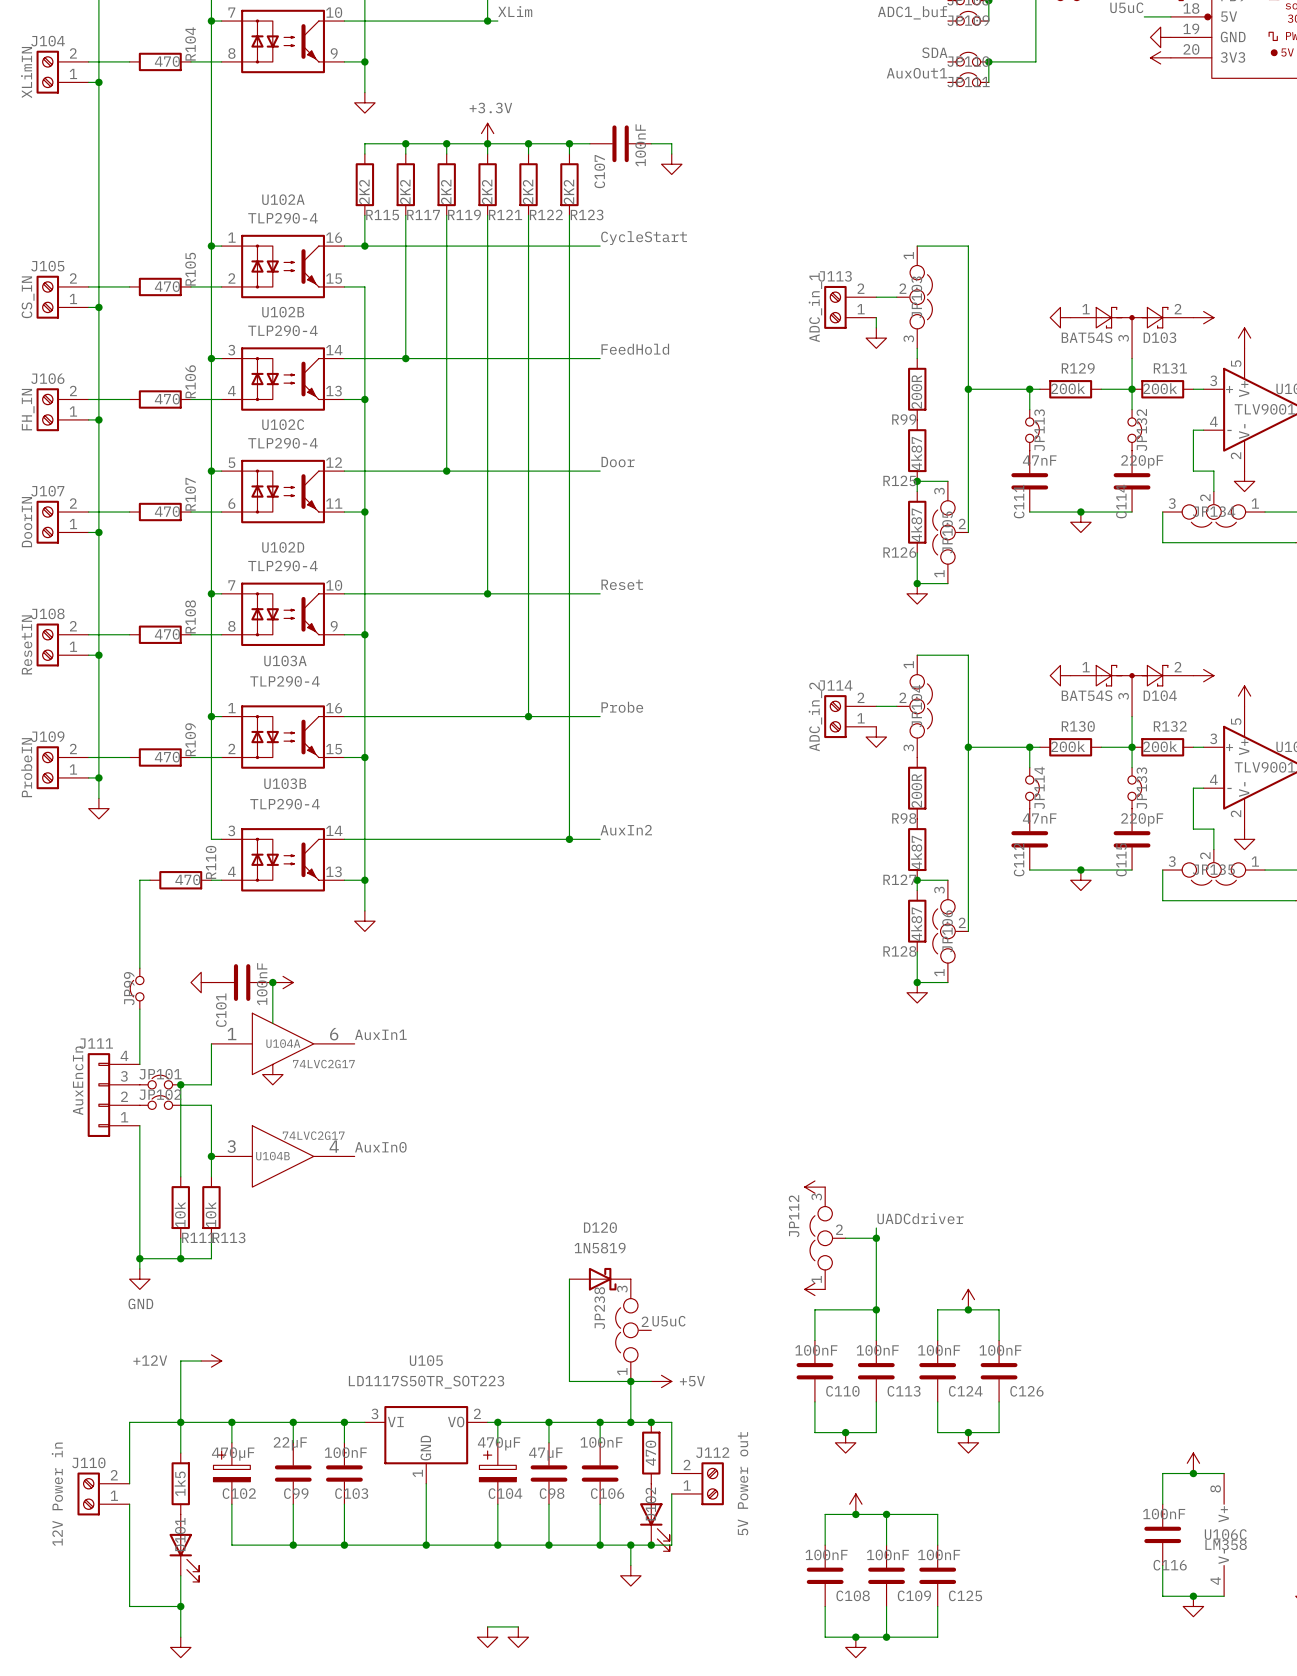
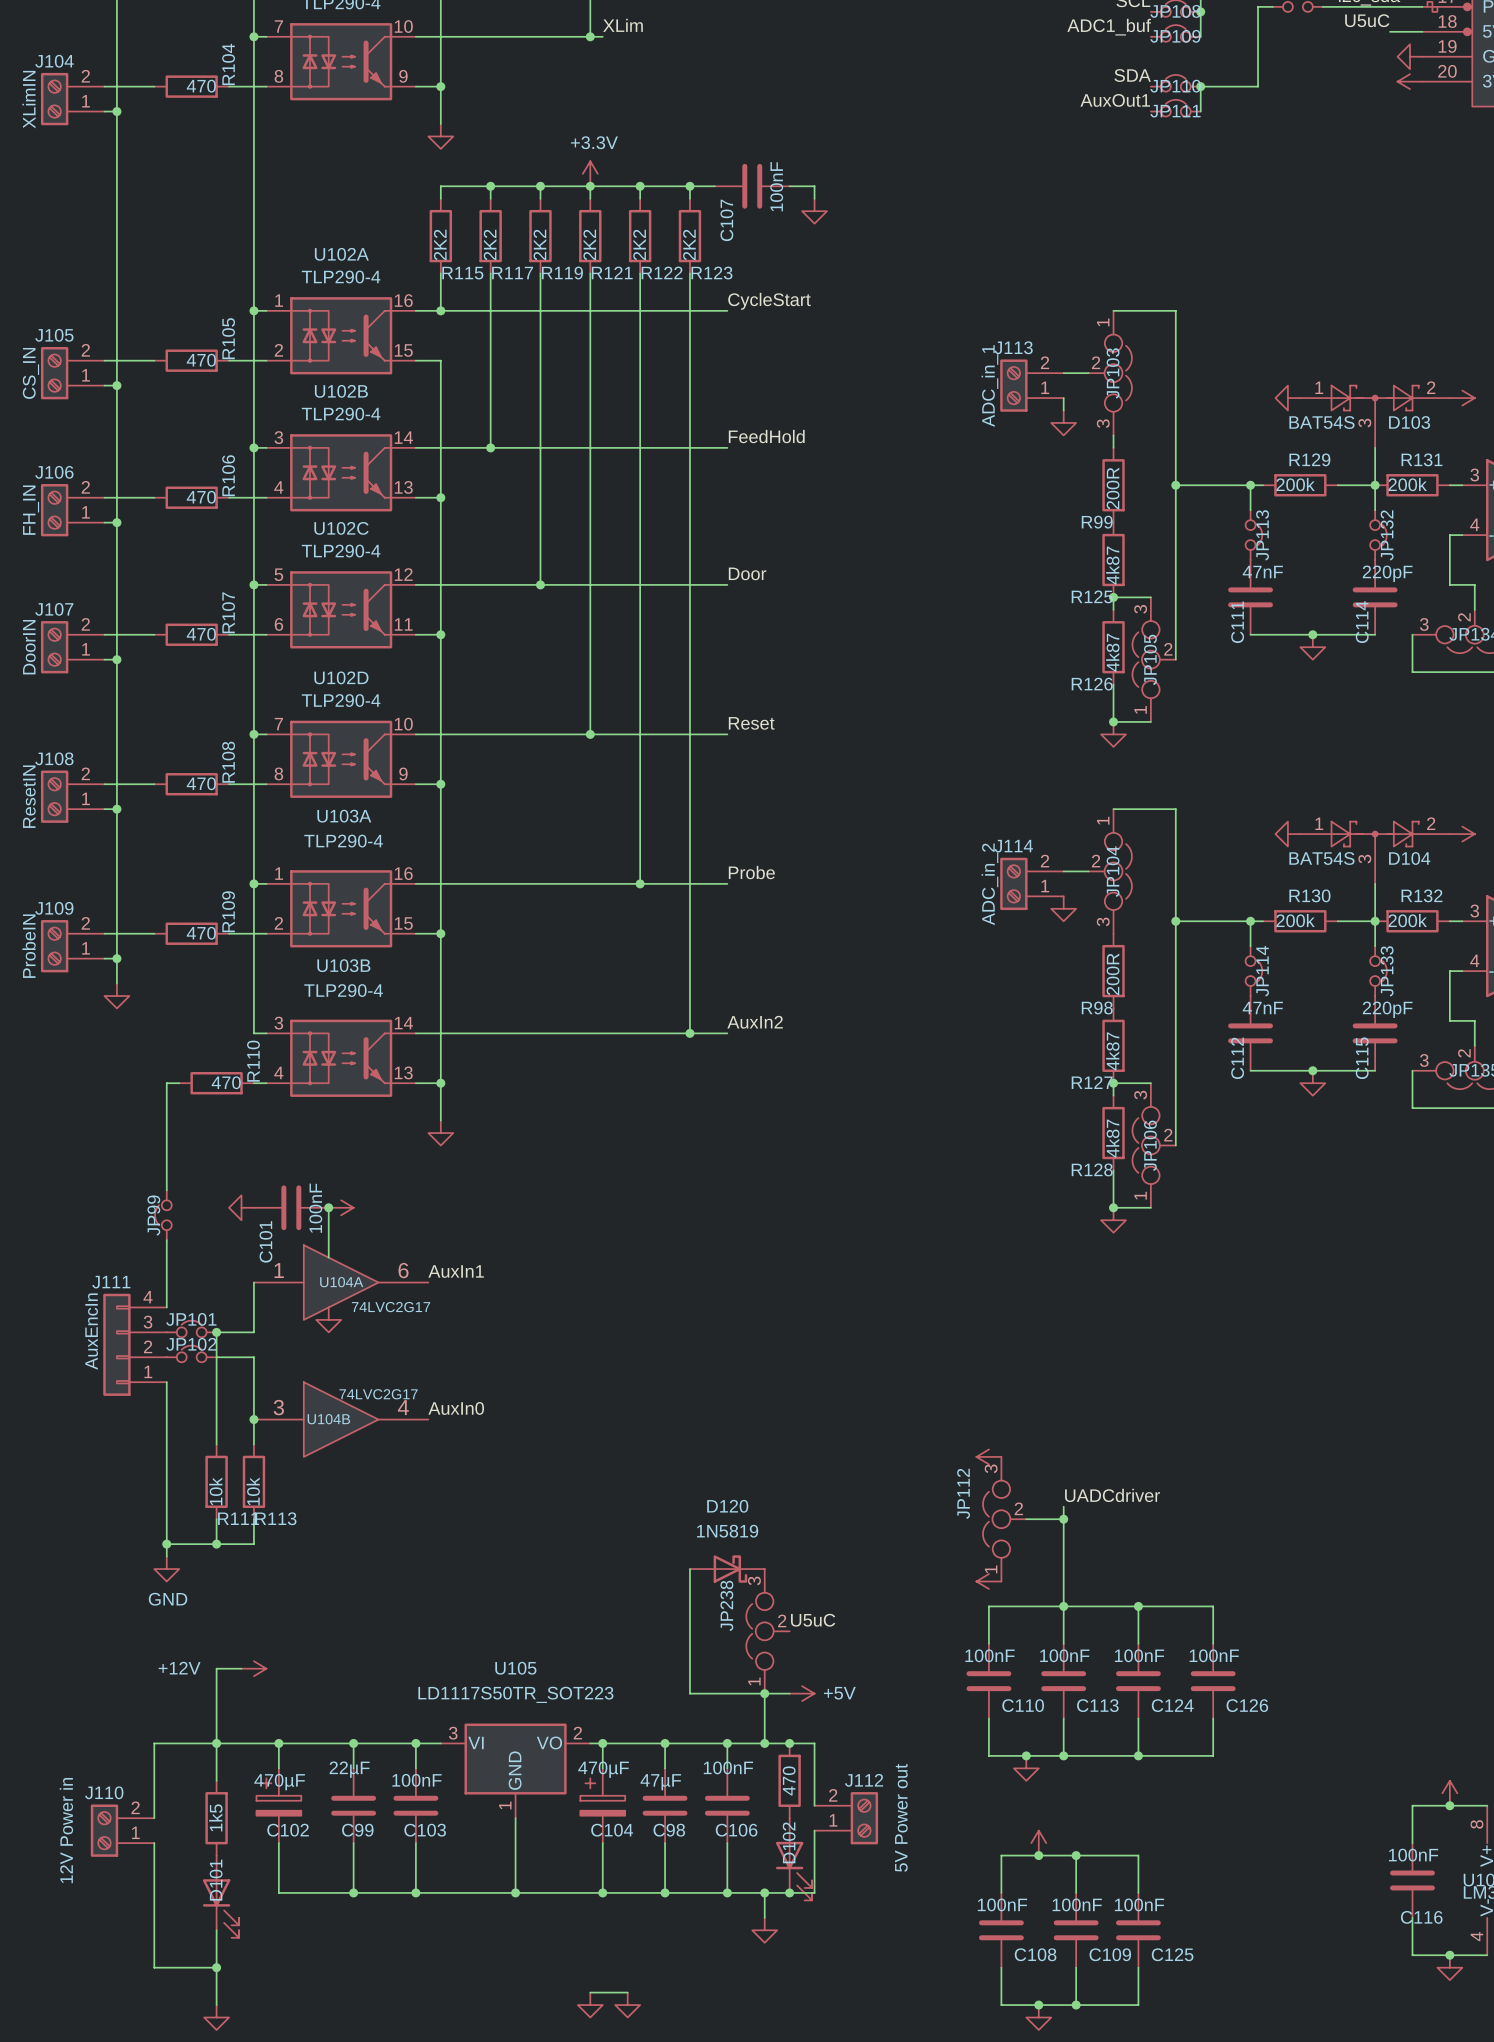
power symbol: (968, 1299) -> none
wire: none -> (1063, 1606) (1138, 1606)
junction position: (968, 1309) -> (1138, 1606)
wire: none -> (1063, 1755) (1138, 1755)
junction: none -> (1063, 1755)
junction position: (968, 1432) -> (1138, 1755)
power symbol: (968, 1442) -> none

